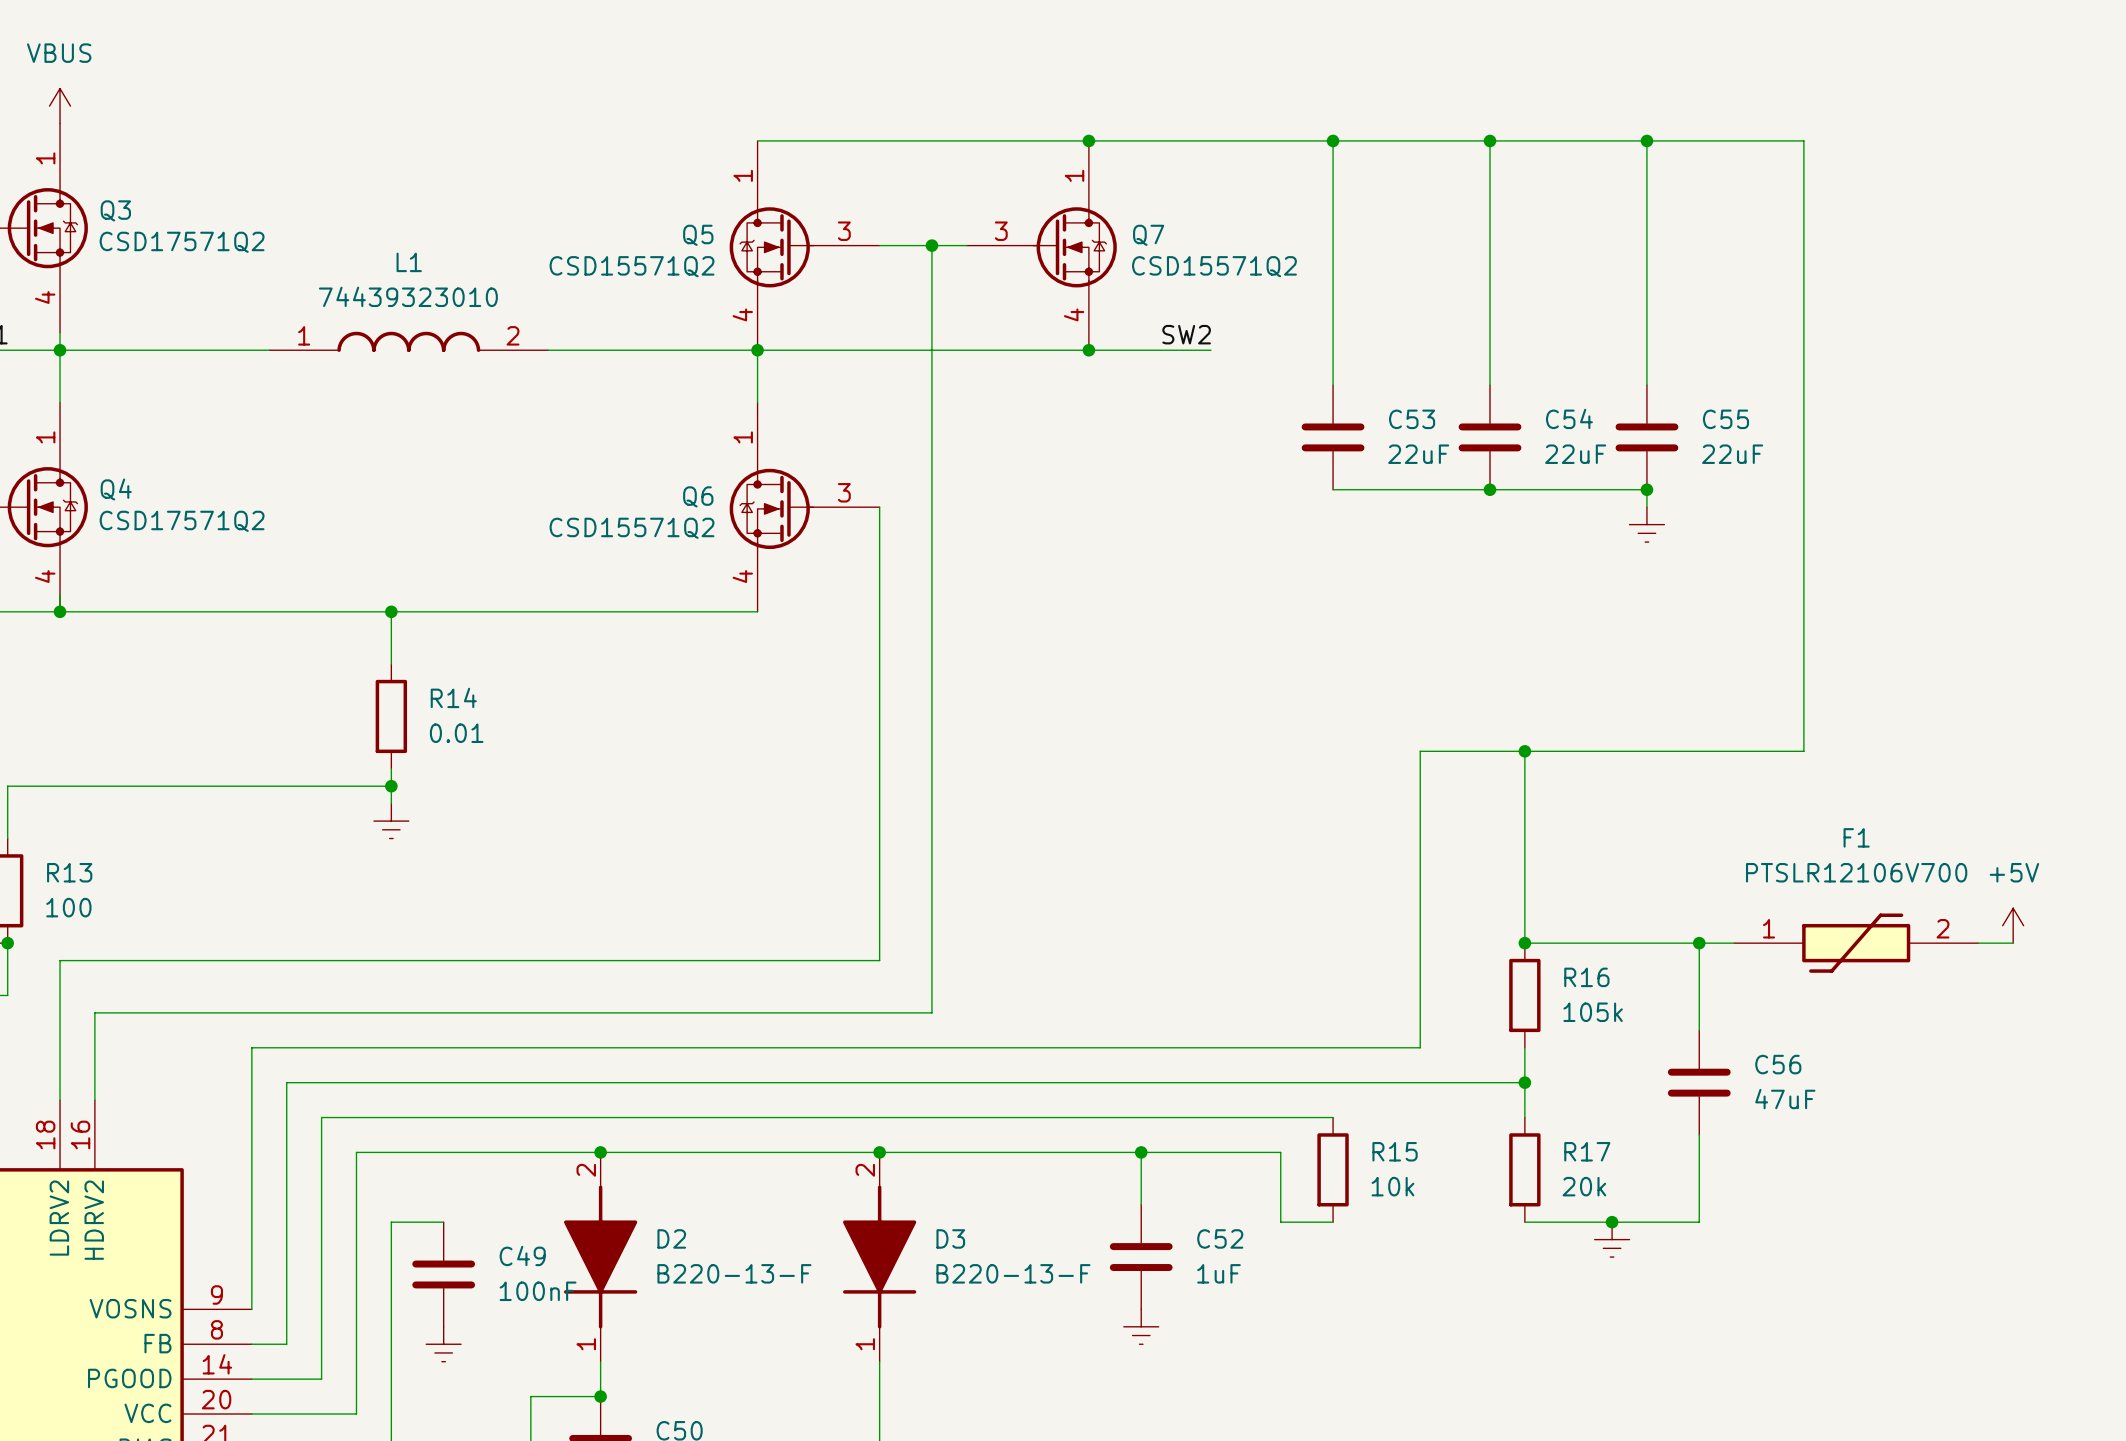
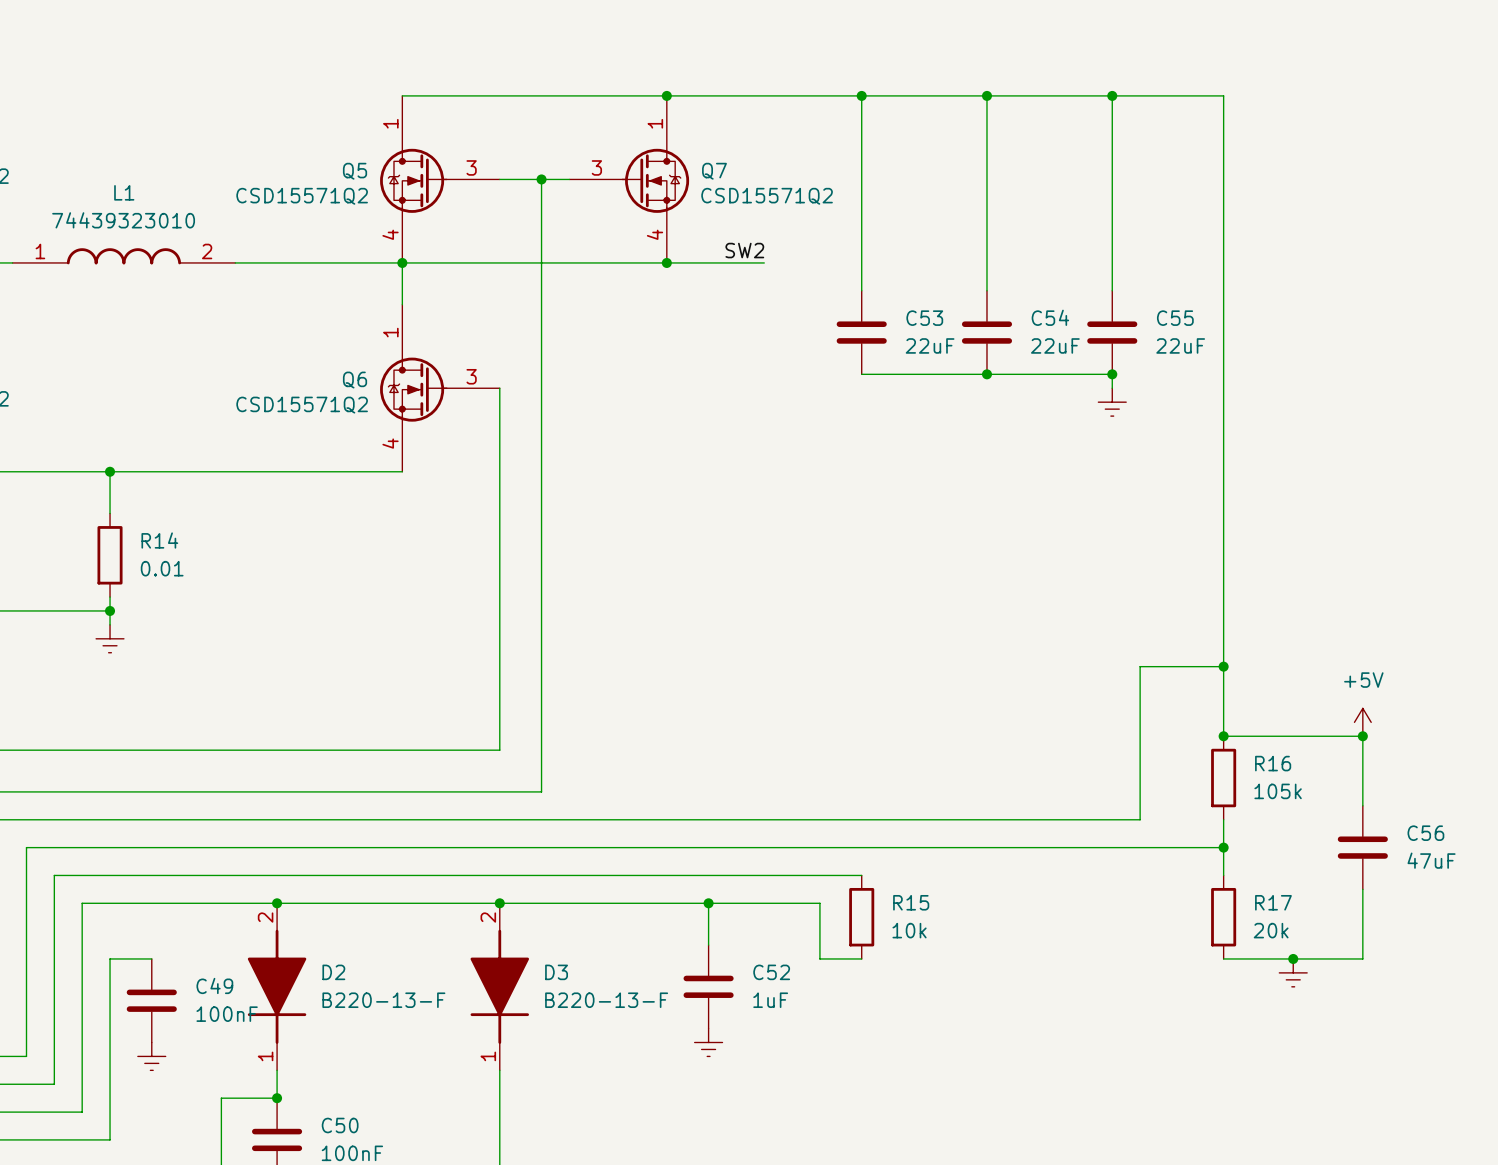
wire: (1786, 140) (1803, 140) (1803, 751) (1420, 751) (1420, 1047) -> (1223, 95) (1223, 736) (1362, 736) (1362, 805)
wire: (1524, 751) (1524, 943) (1734, 943) -> none
junction: (1524, 751) -> none
wire: none -> (1223, 666) (1140, 666) (1140, 819) (931, 819)
junction: none -> (1223, 666)
power symbol position: +5V (2013, 925) -> +5V (1362, 722)
junction: (1524, 943) -> none
wire: (1699, 943) (1699, 1030) -> none
junction: (1699, 943) -> none
junction: none -> (1223, 736)
F1: PTSLR12106V700 (1856, 943) -> none
junction: none -> (1362, 736)
wire: (1978, 943) (2013, 943) -> none
R16 position: (1524, 995) -> (1223, 778)
wire: (1524, 1047) (1524, 1117) -> (1223, 819) (1223, 875)
wire: none -> (1014, 847) (1223, 847)
junction: (1524, 1082) -> none
C56 position: (1699, 1082) -> (1362, 847)
junction: none -> (1223, 847)
wire: (1699, 1134) (1699, 1222) (1524, 1222) -> (1362, 889) (1362, 958) (1223, 958)
R17 position: (1524, 1169) -> (1223, 917)
junction: (1612, 1222) -> none
junction: none -> (1293, 958)
power symbol position: (1612, 1239) -> (1293, 972)

